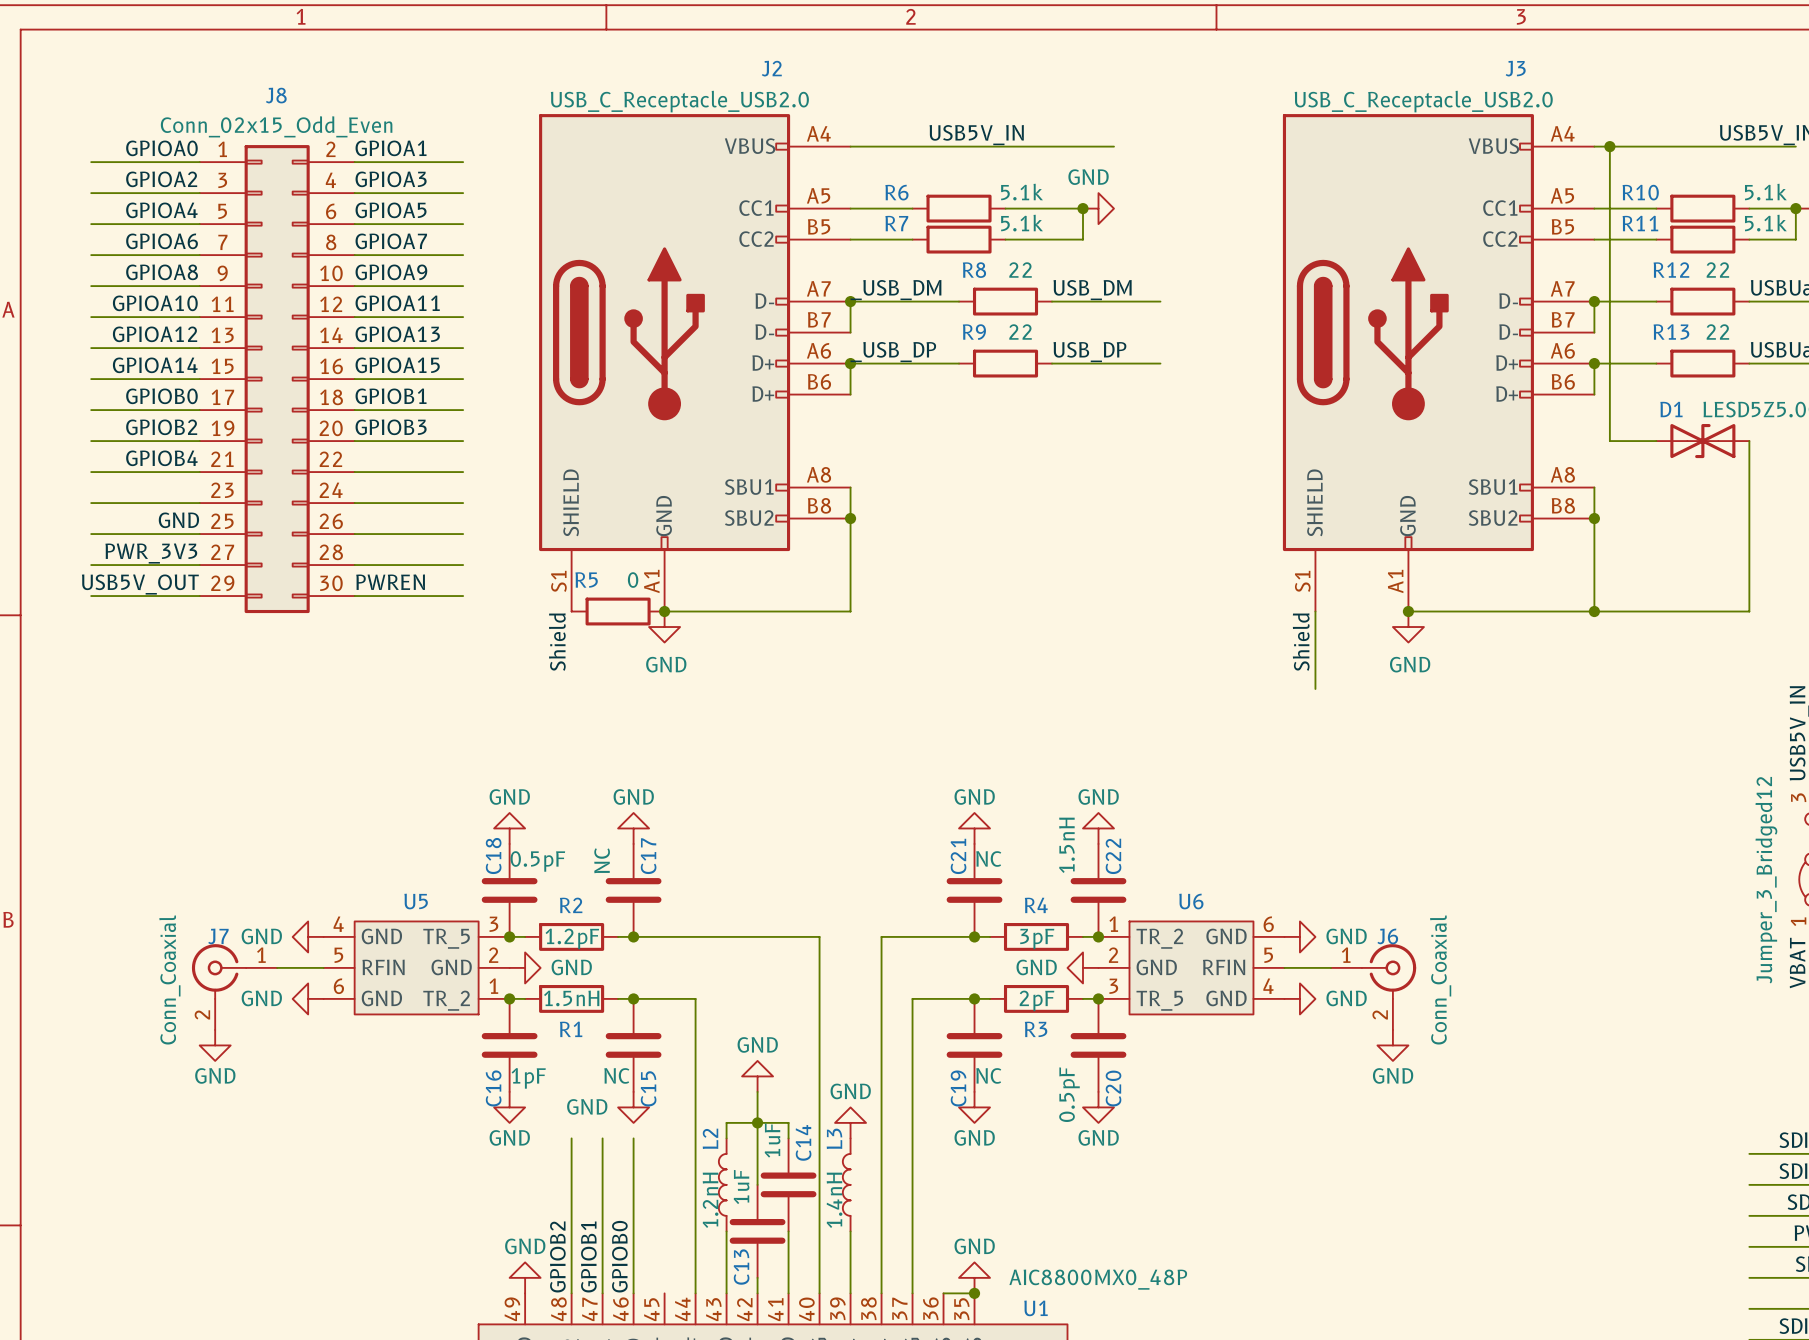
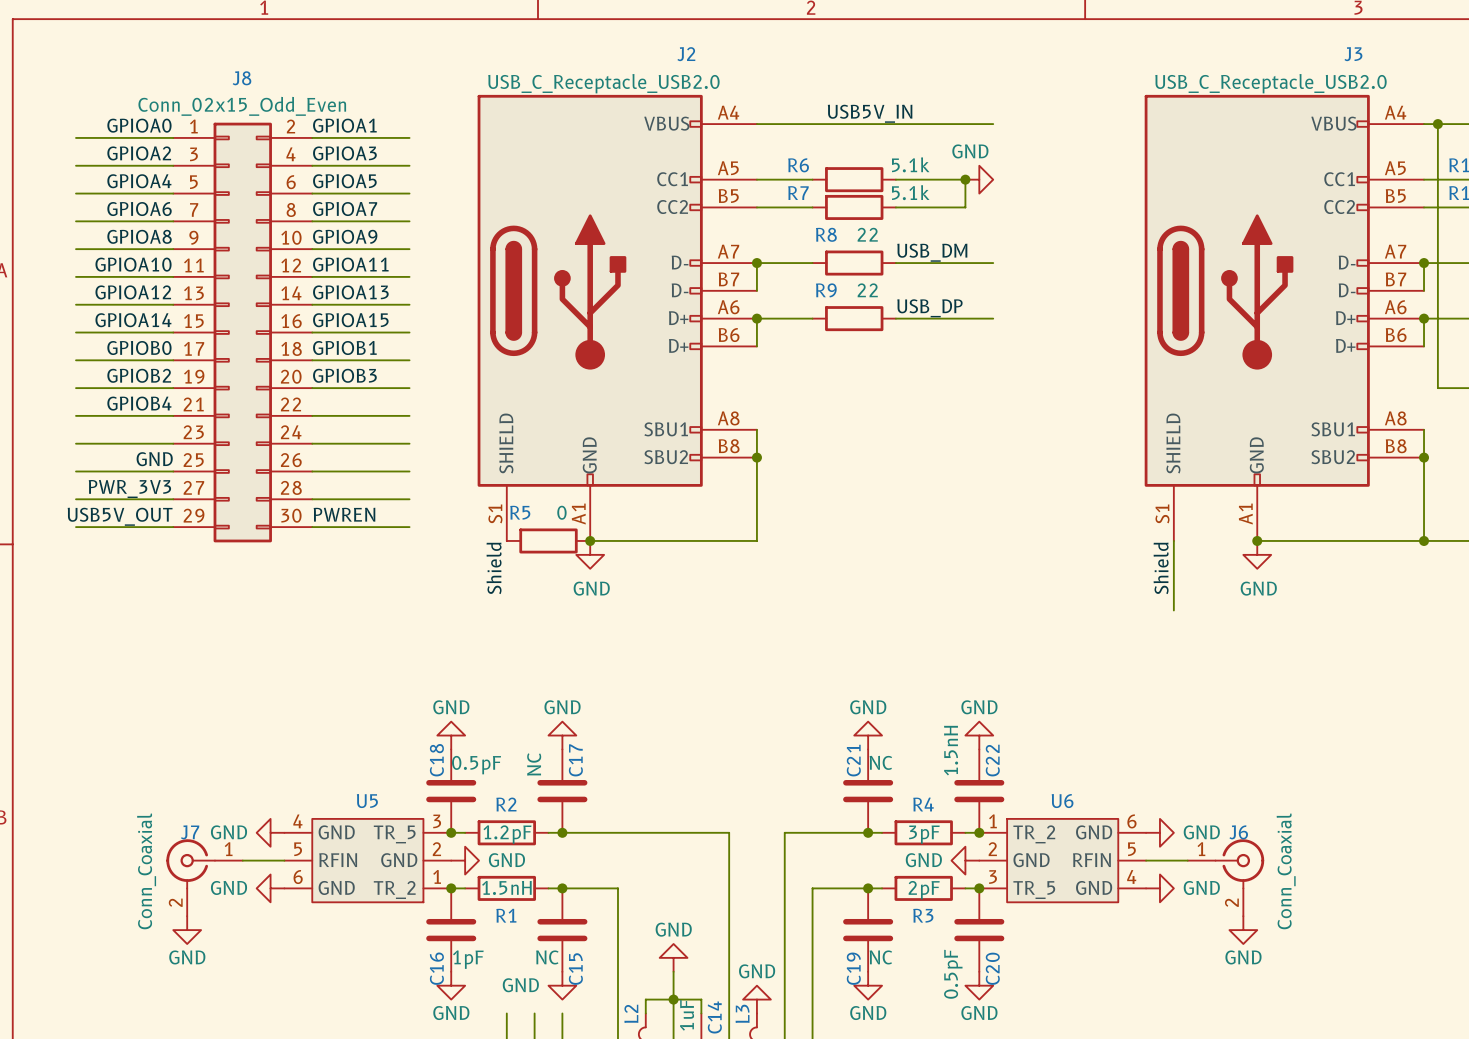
label: _USB_DM (895, 290) -> none
label position: USB_DM (1092, 290) -> USB_DM (932, 252)
wire: (912, 301) (959, 301) -> (895, 263) (937, 263)
R8 position: (1005, 301) -> (854, 263)
wire: (1113, 301) (1160, 301) -> none
label: _USB_DP (893, 352) -> none
label position: USB_DP (1089, 352) -> USB_DP (929, 308)
wire: (912, 363) (959, 363) -> (895, 318) (937, 318)
R9 position: (1005, 363) -> (854, 318)
wire: (1113, 363) (1160, 363) -> none

